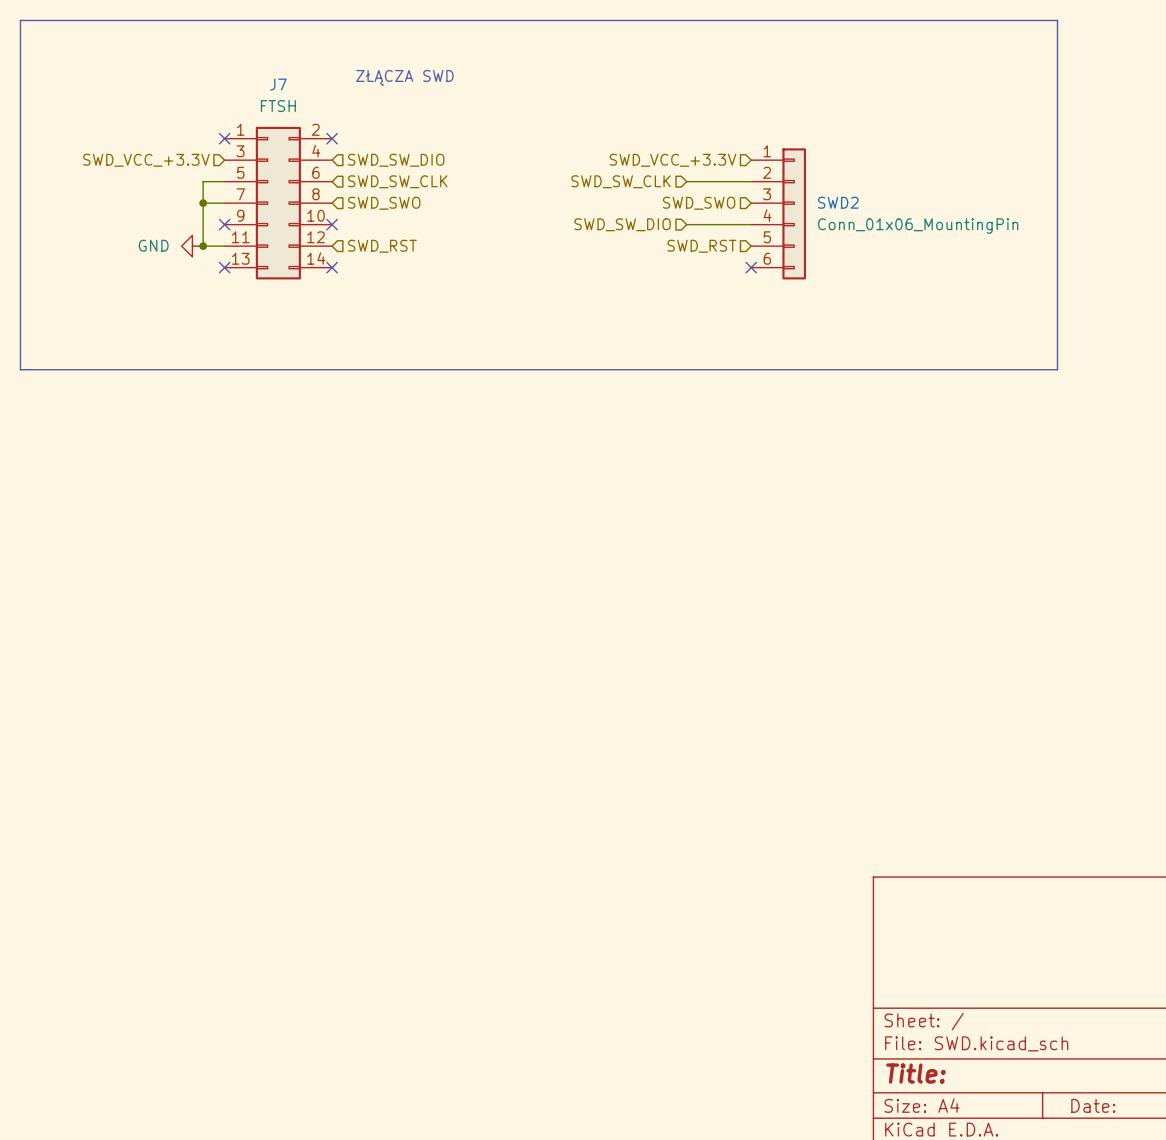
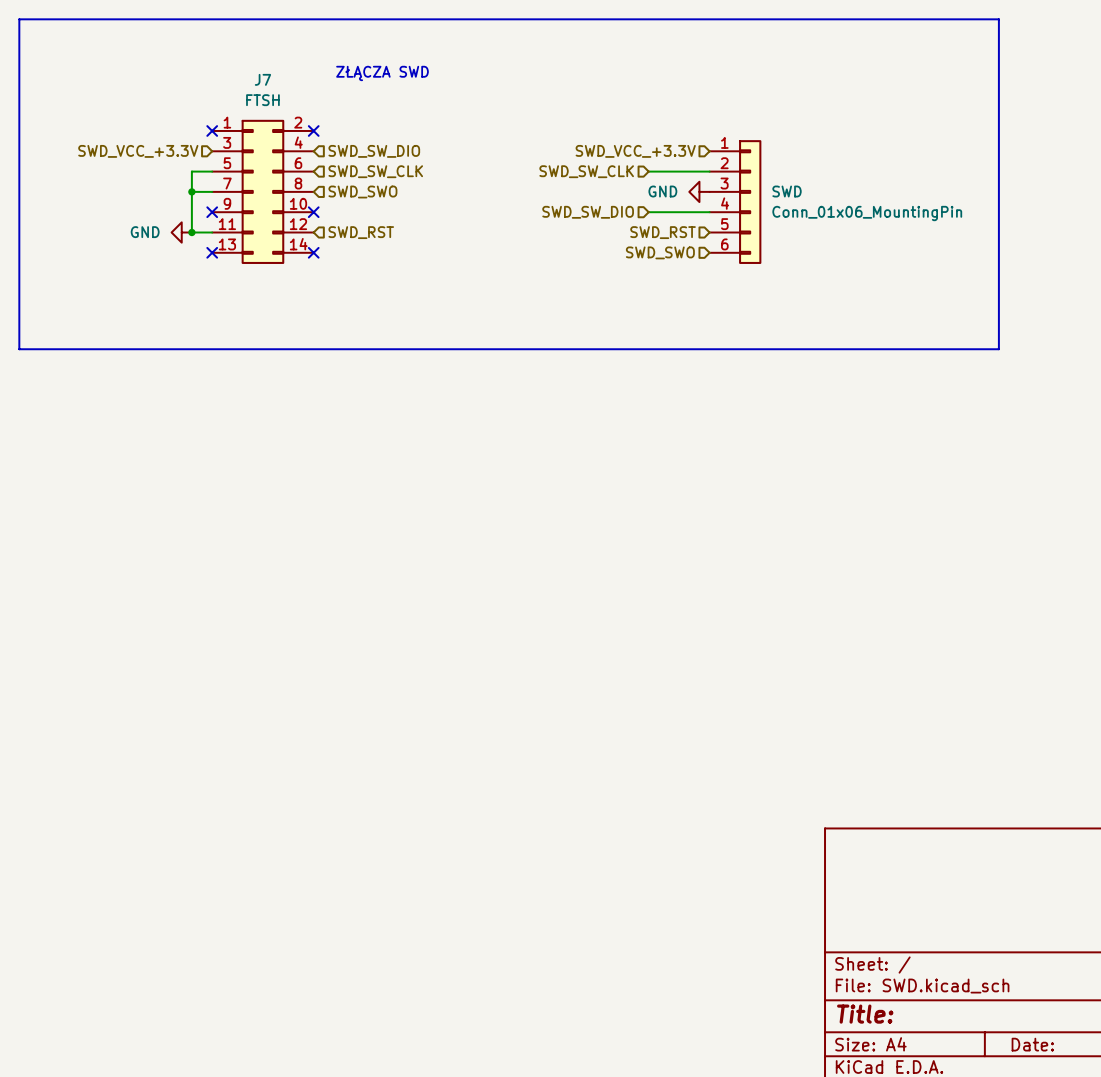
SWD2 name: SWD2 (838, 202) -> SWD (787, 191)
hierarchical label position: SWD_SWO (699, 203) -> SWD_SWO (660, 252)
power symbol: none -> GND (699, 191)
no-connect mark: (751, 267) -> none

